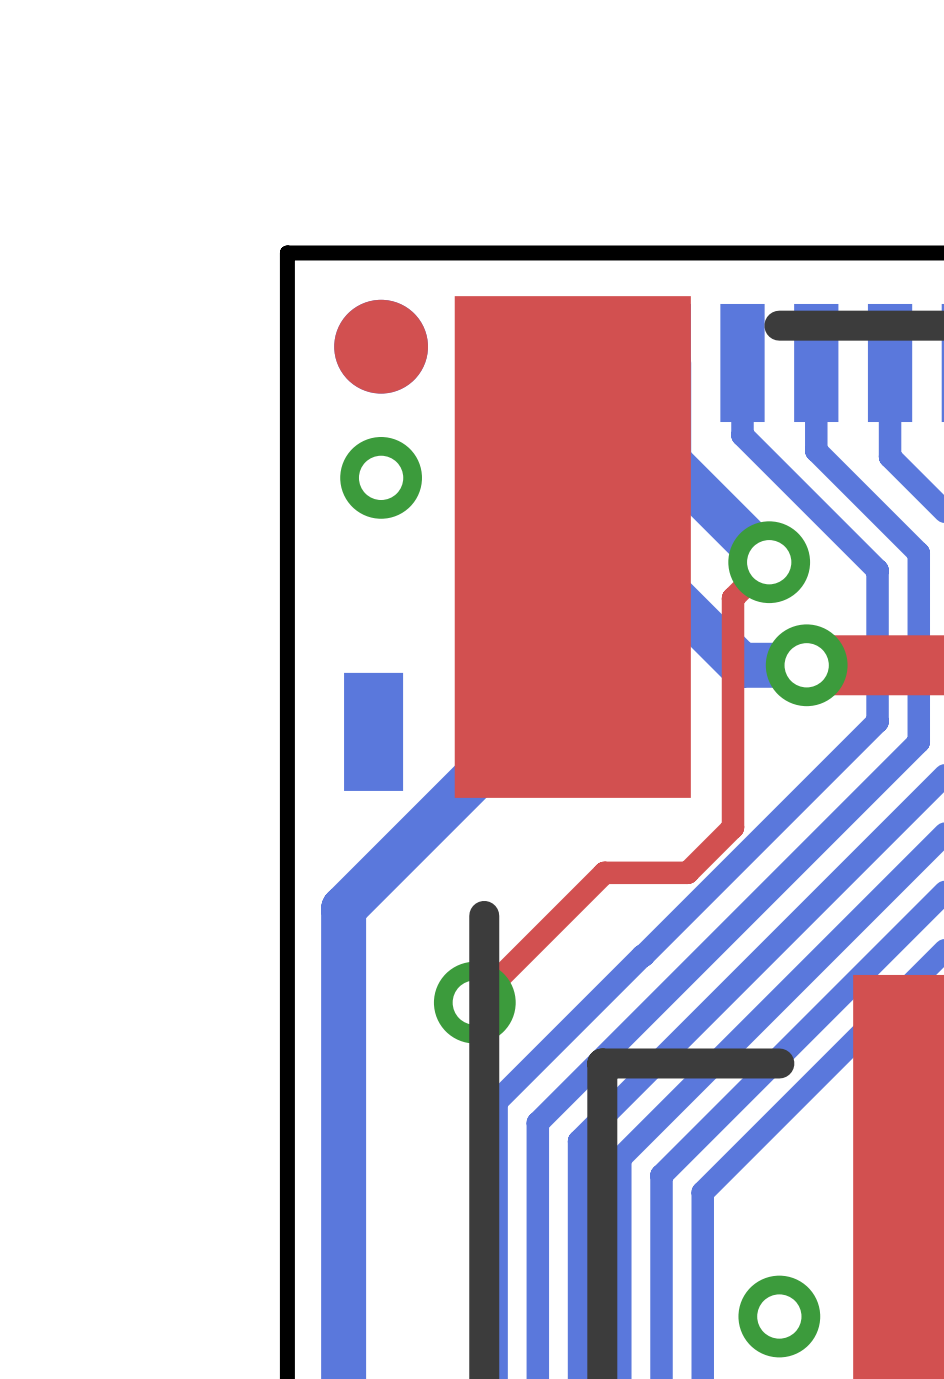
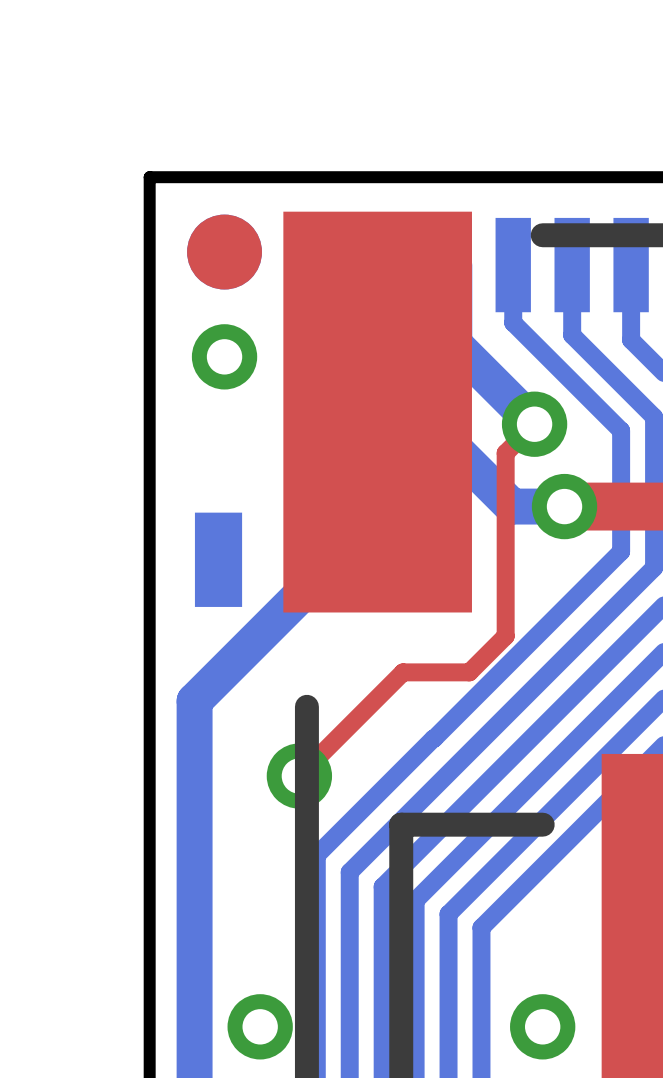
via: none -> (260, 1026)

